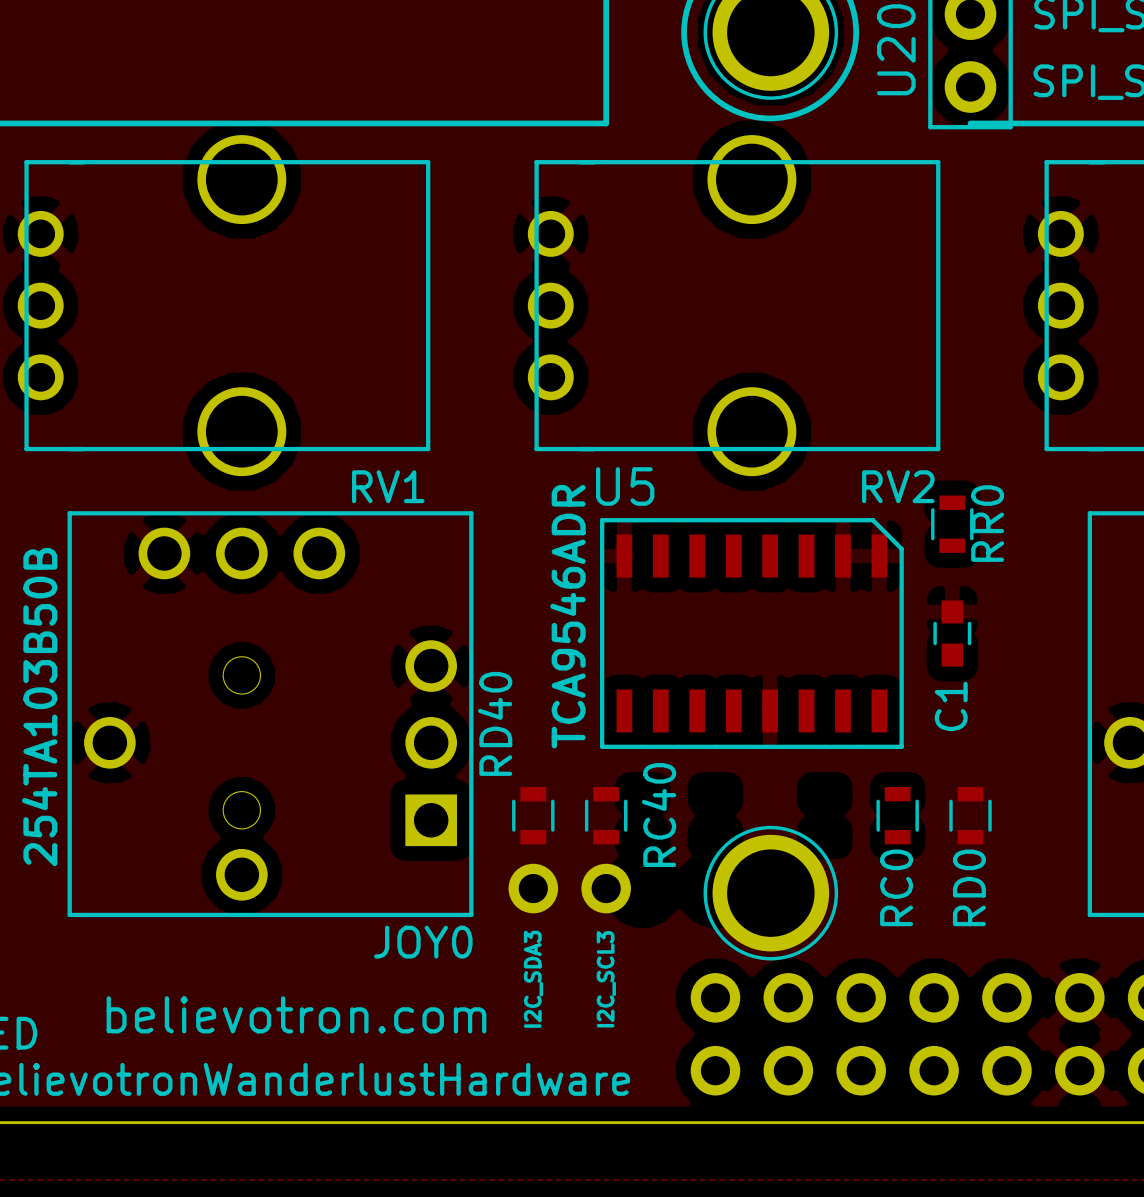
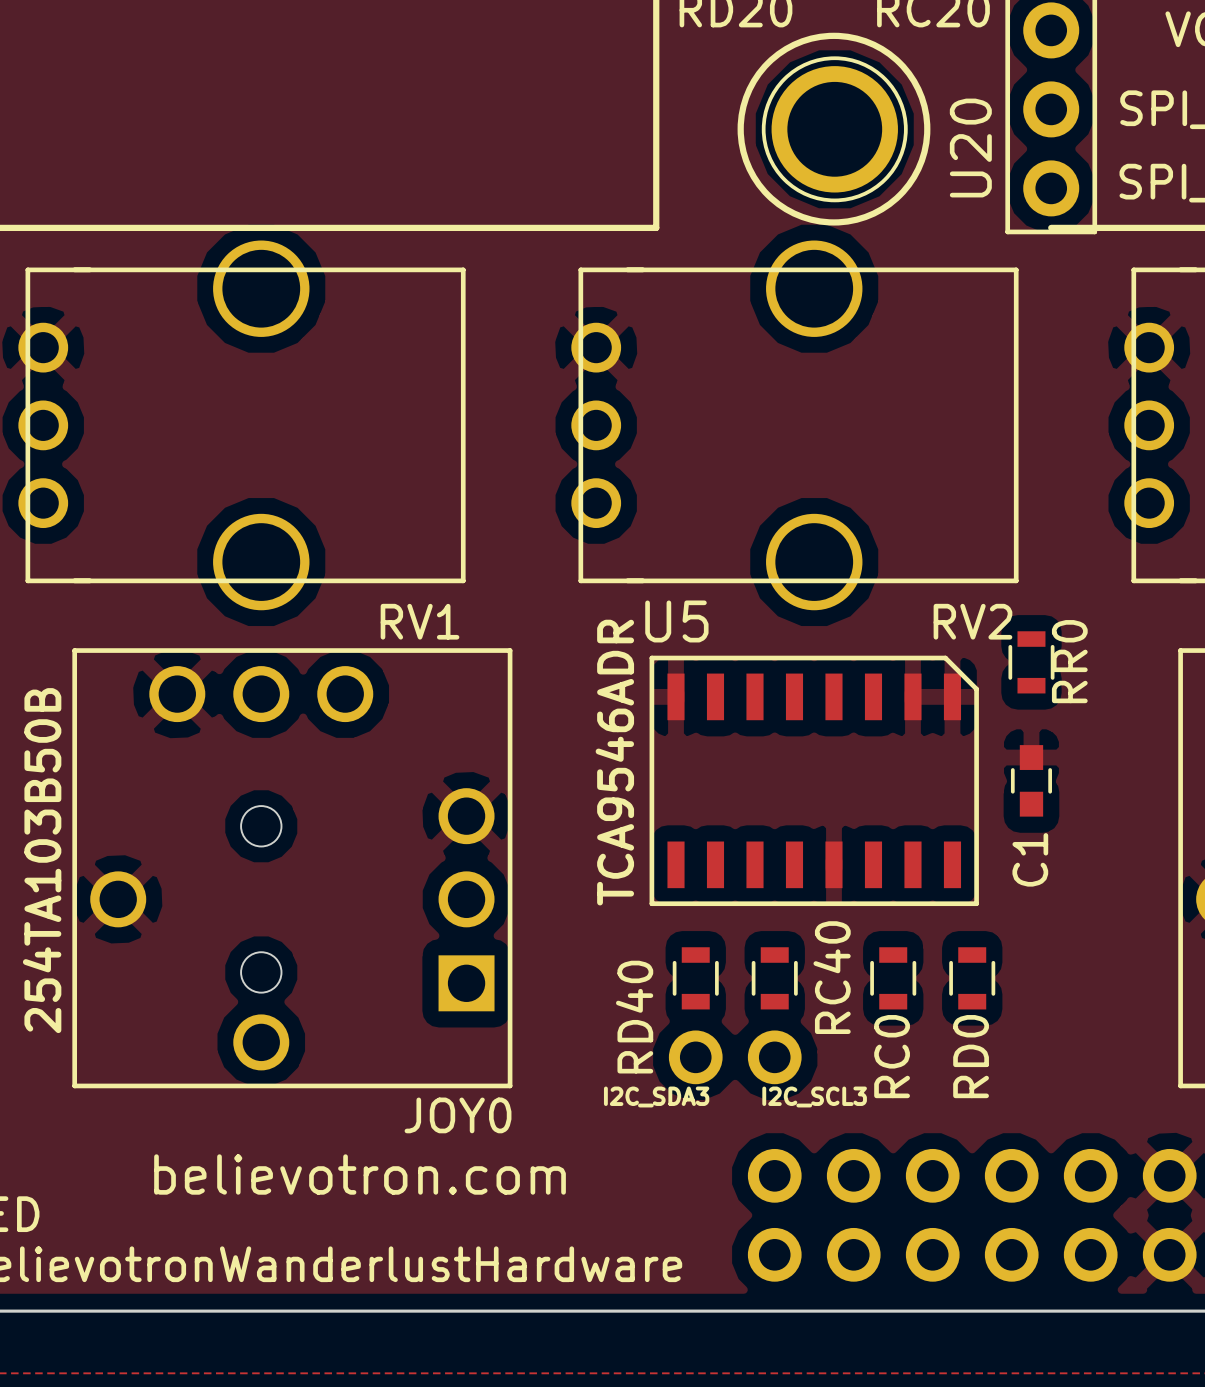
RD40 name position: RD40 (495, 723) -> RD40 (634, 1017)
RD40 position: (533, 815) -> (695, 978)
RC40 position: (606, 815) -> (774, 978)
RC0: none -> (893, 978)
RD0: (970, 815) -> none
RC0 name: RC0 (896, 887) -> RD0 (971, 1056)
I2C_SDA3 position: (533, 888) -> (695, 1057)
I2C_SCL3 position: (606, 888) -> (774, 1057)
part: (770, 893) -> none
I2C_SDA3 name rotation: 0° (533, 979) -> 90° clockwise (656, 1096)
I2C_SCL3 name rotation: 0° (606, 979) -> 90° clockwise (814, 1096)
text position: believotron.com (296, 1014) -> believotron.com (360, 1174)

